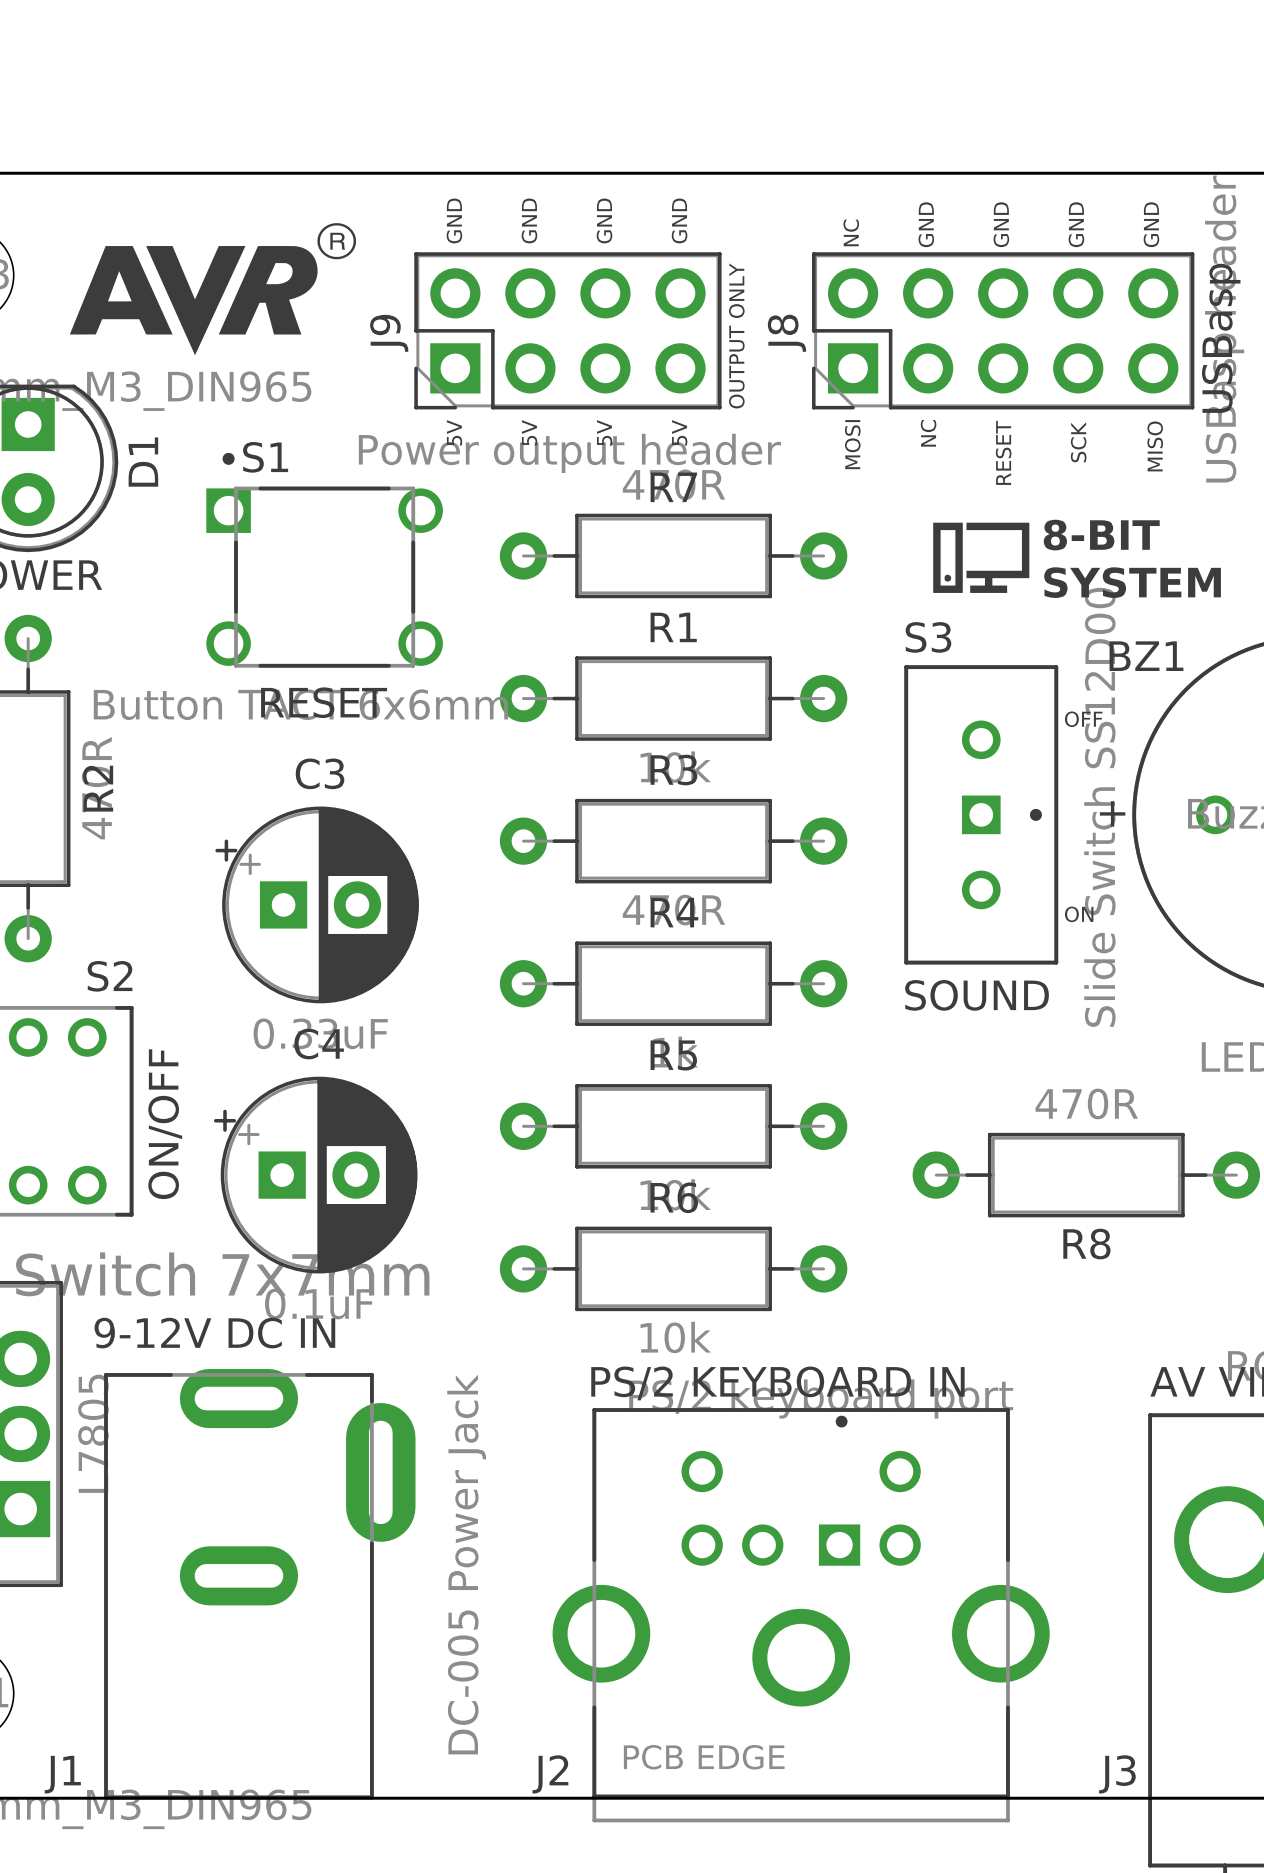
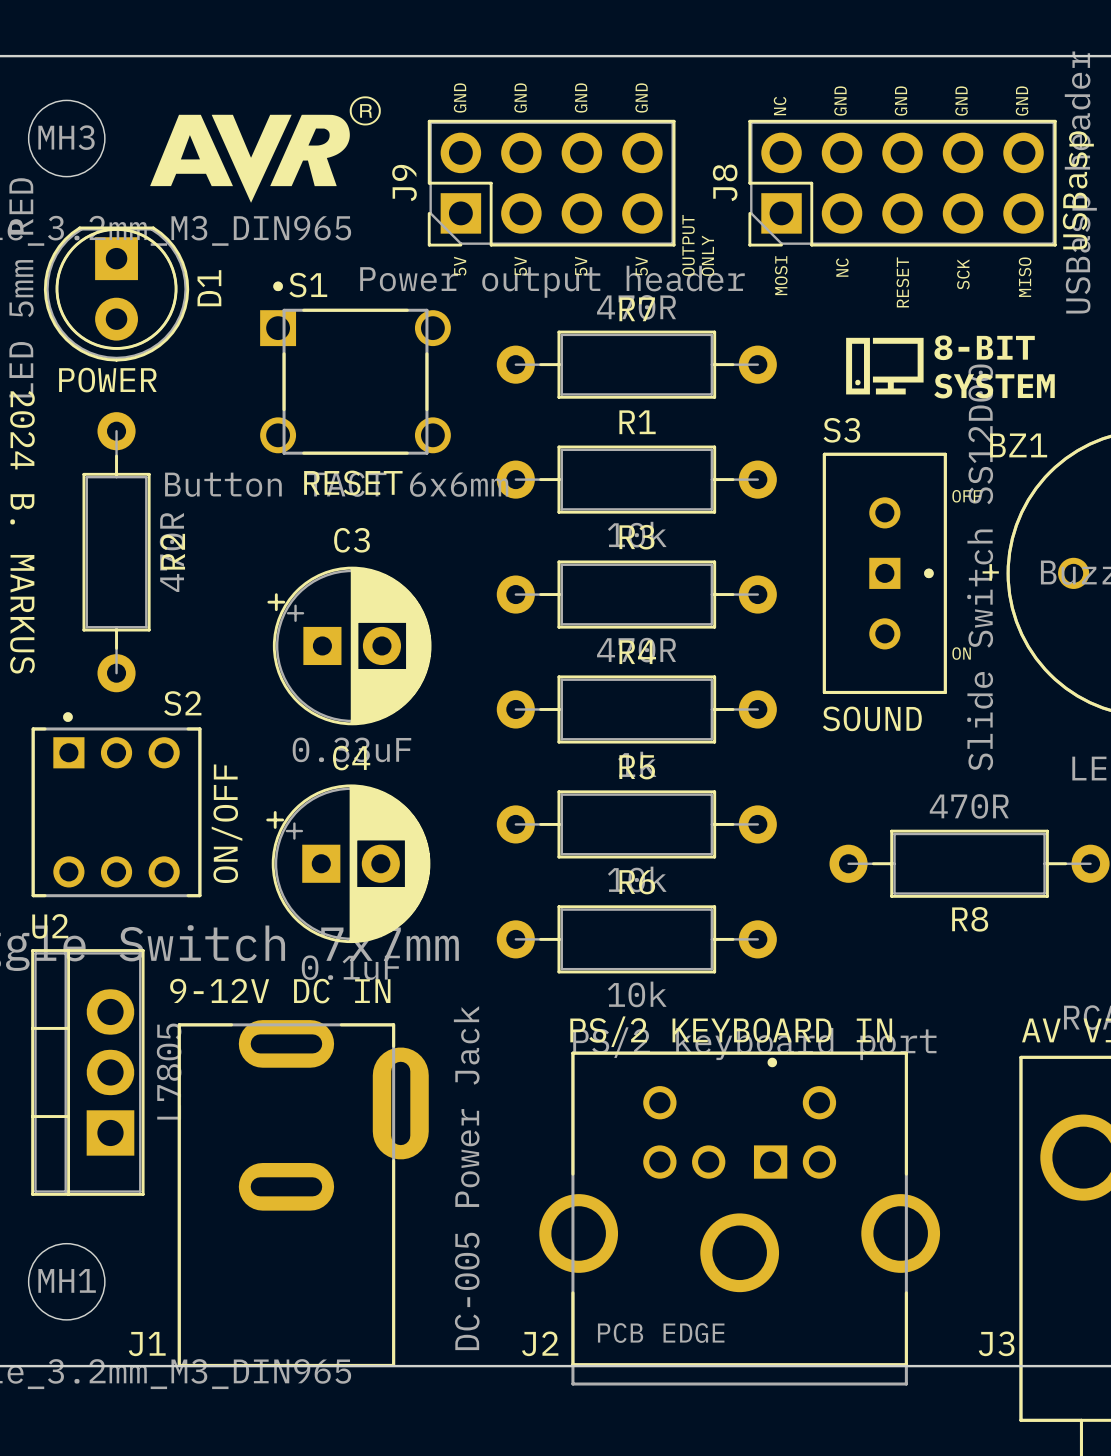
text: OUTPUT ONLY (736, 335) -> OUTPUT (688, 245)
text: none -> ONLY (707, 255)

